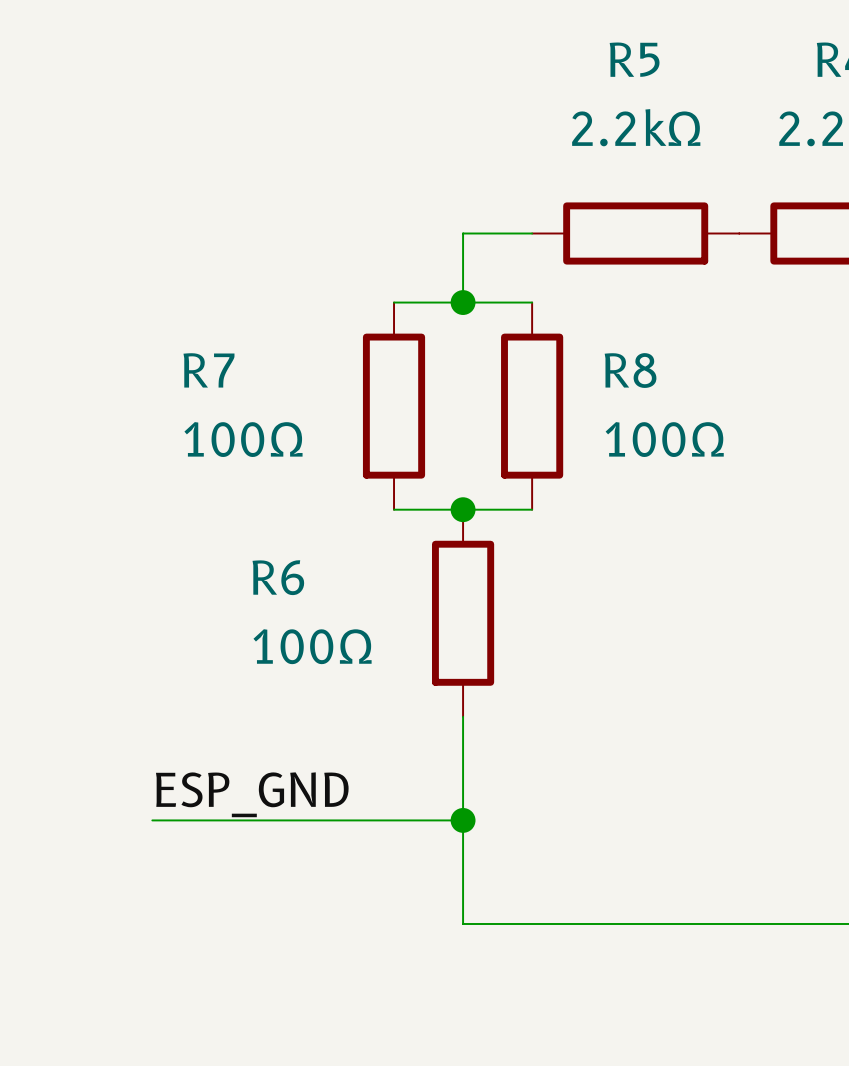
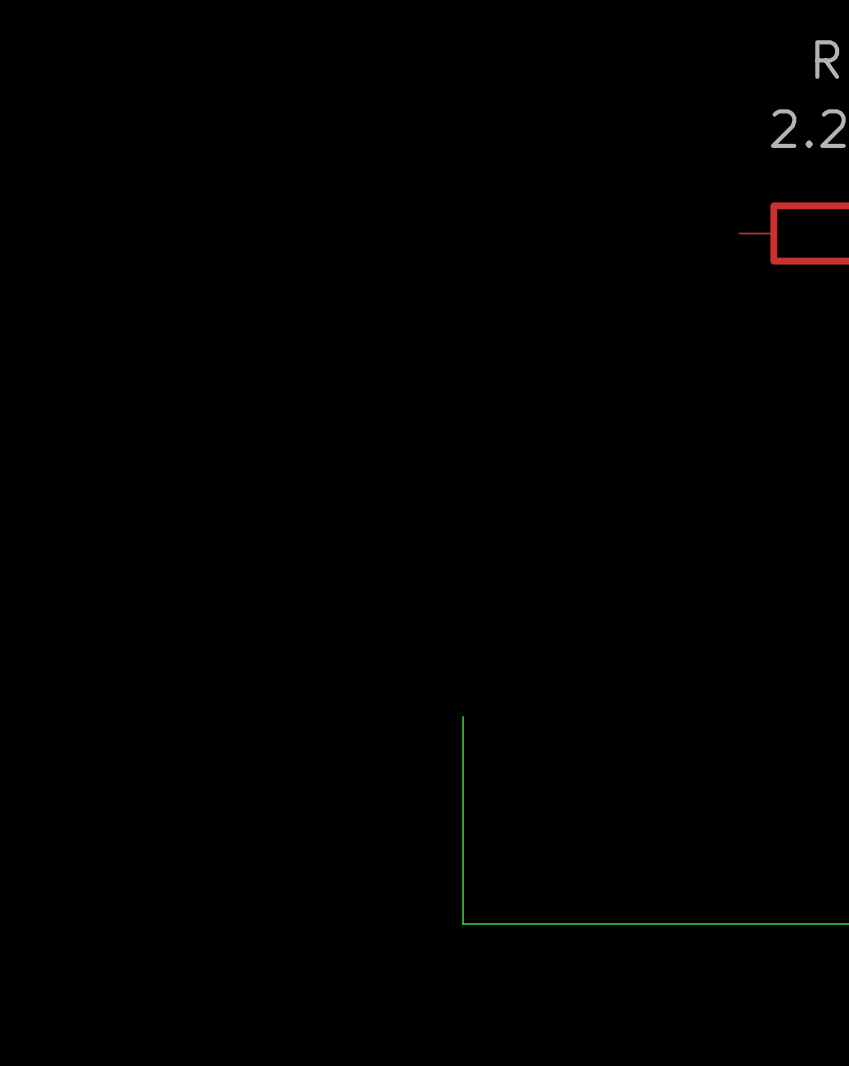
wire: (532, 233) (463, 233) (463, 302) -> none
R5: 2.2kΩ (635, 233) -> none
wire: (394, 302) (532, 302) -> none
junction: (463, 302) -> none
R7: 100Ω (394, 406) -> none
R8: 100Ω (532, 406) -> none
wire: (394, 509) (532, 509) -> none
junction: (463, 509) -> none
R6: 100Ω (463, 613) -> none
label: ESP_GND (252, 794) -> none
wire: (152, 820) (463, 820) -> none
junction: (463, 820) -> none

